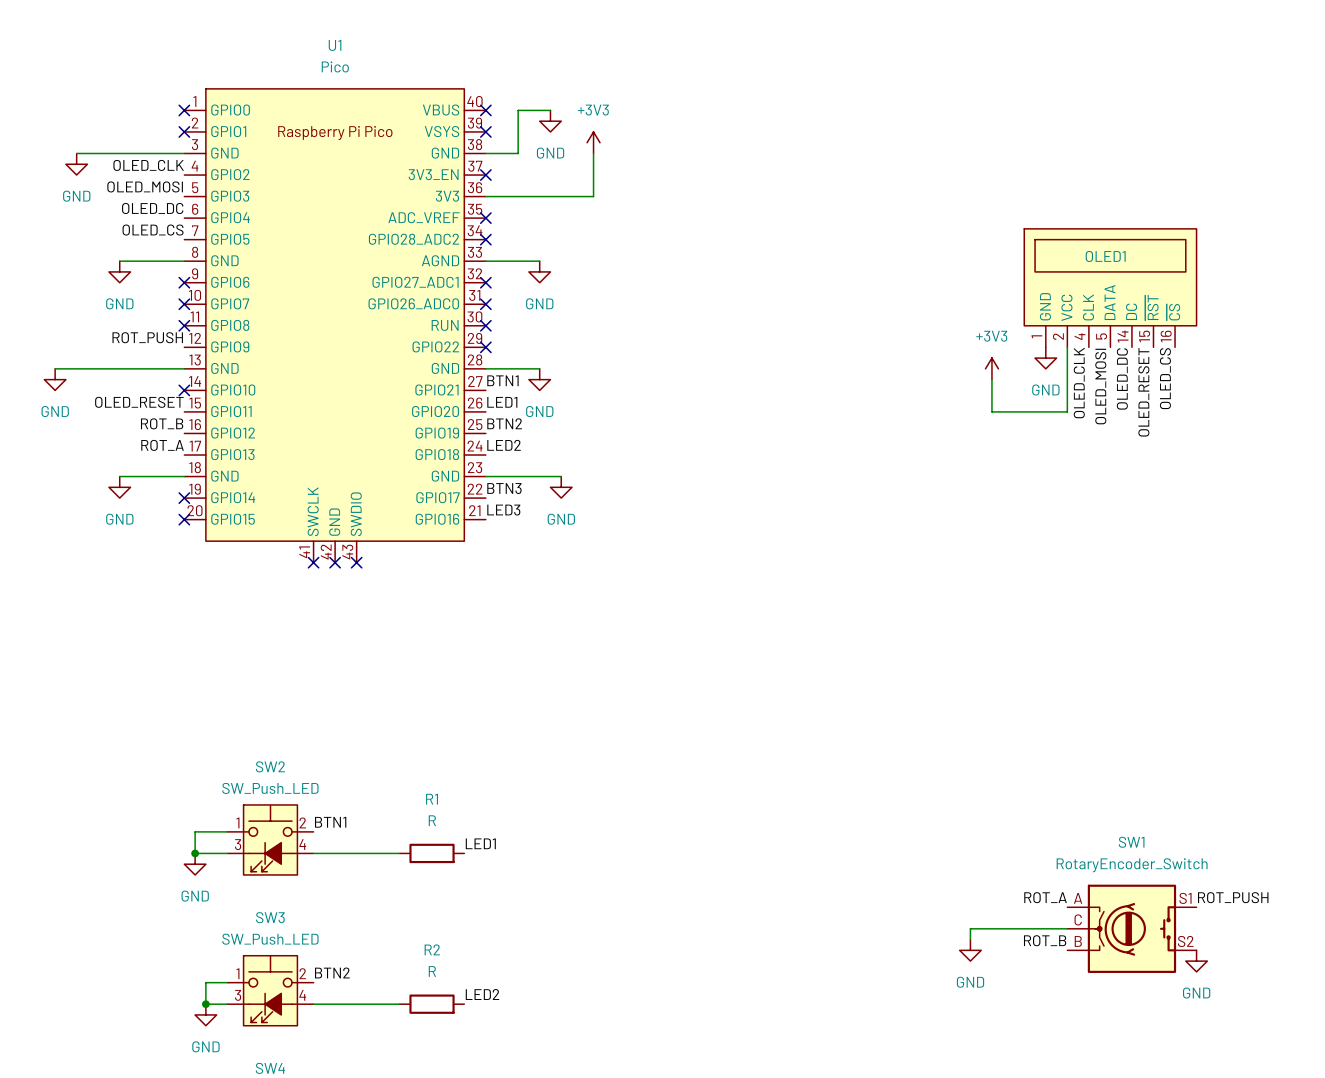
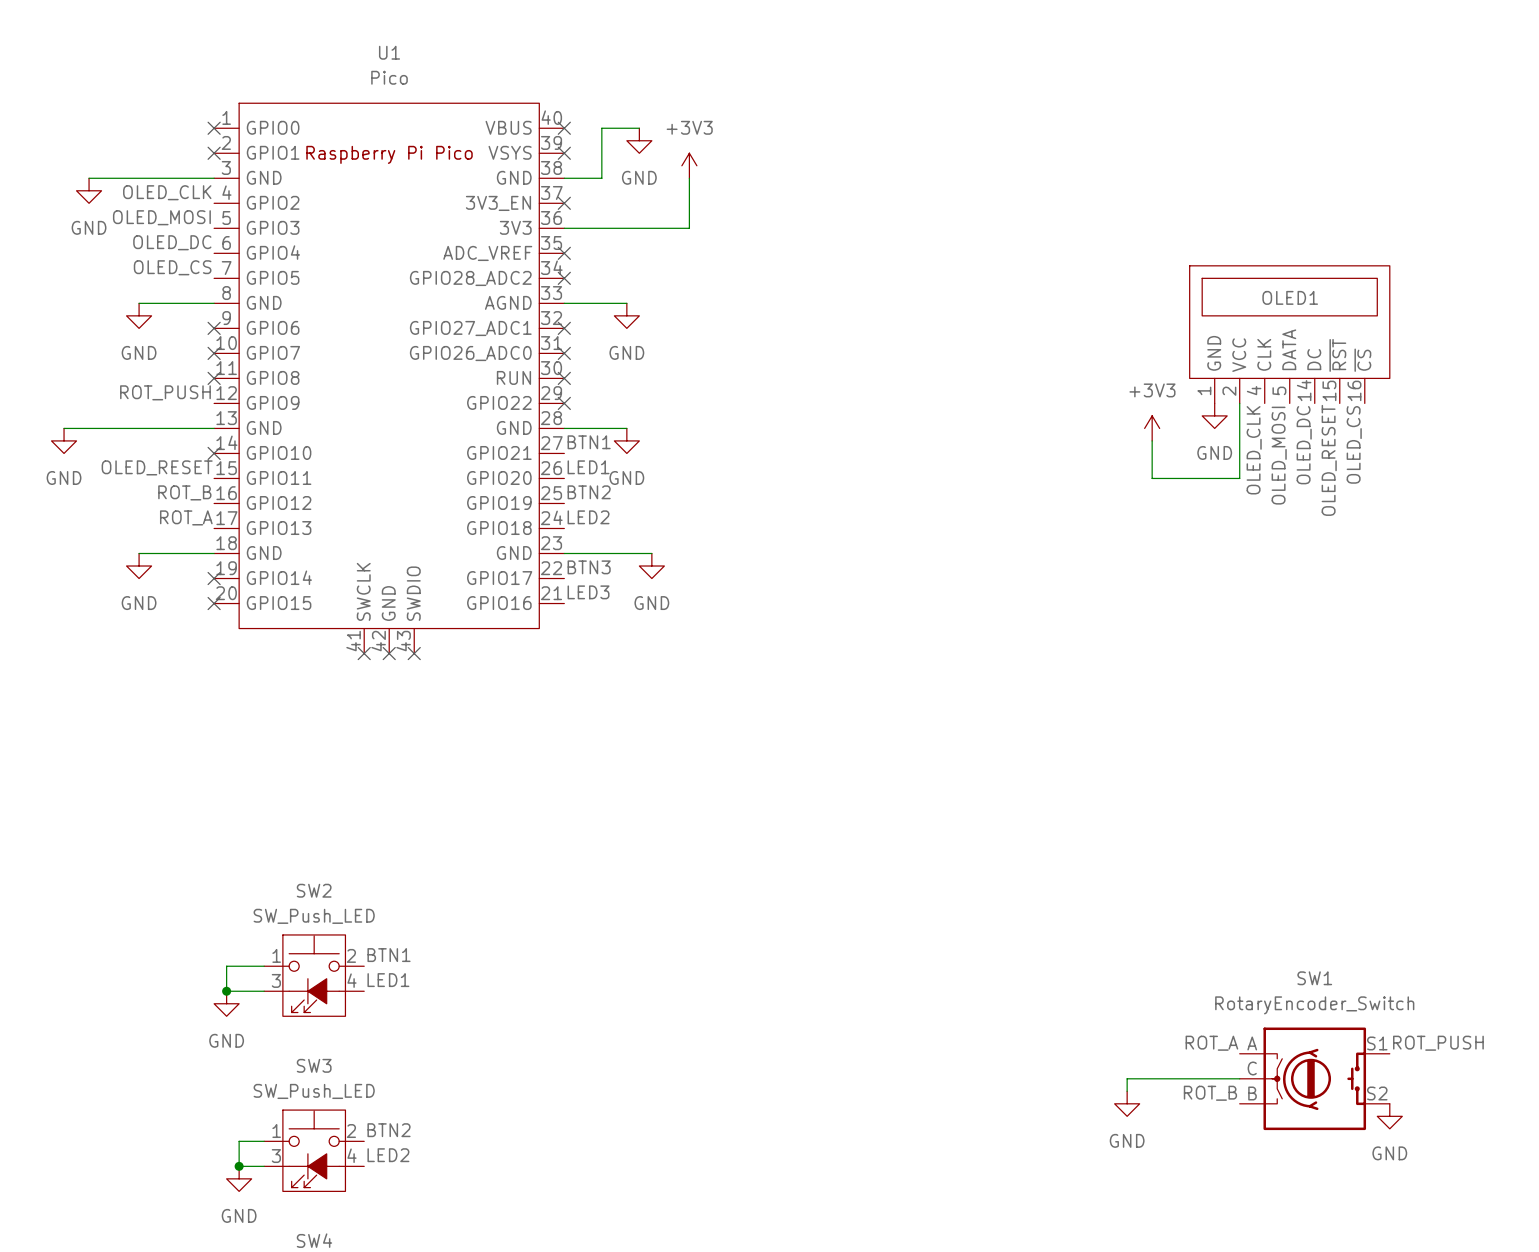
label position: LED1 (480, 843) -> LED1 (388, 980)
wire: (313, 853) (399, 853) -> none
R1: R (432, 853) -> none
label position: LED2 (482, 994) -> LED2 (388, 1155)
wire: (313, 1004) (399, 1004) -> none
R2: R (432, 1004) -> none

